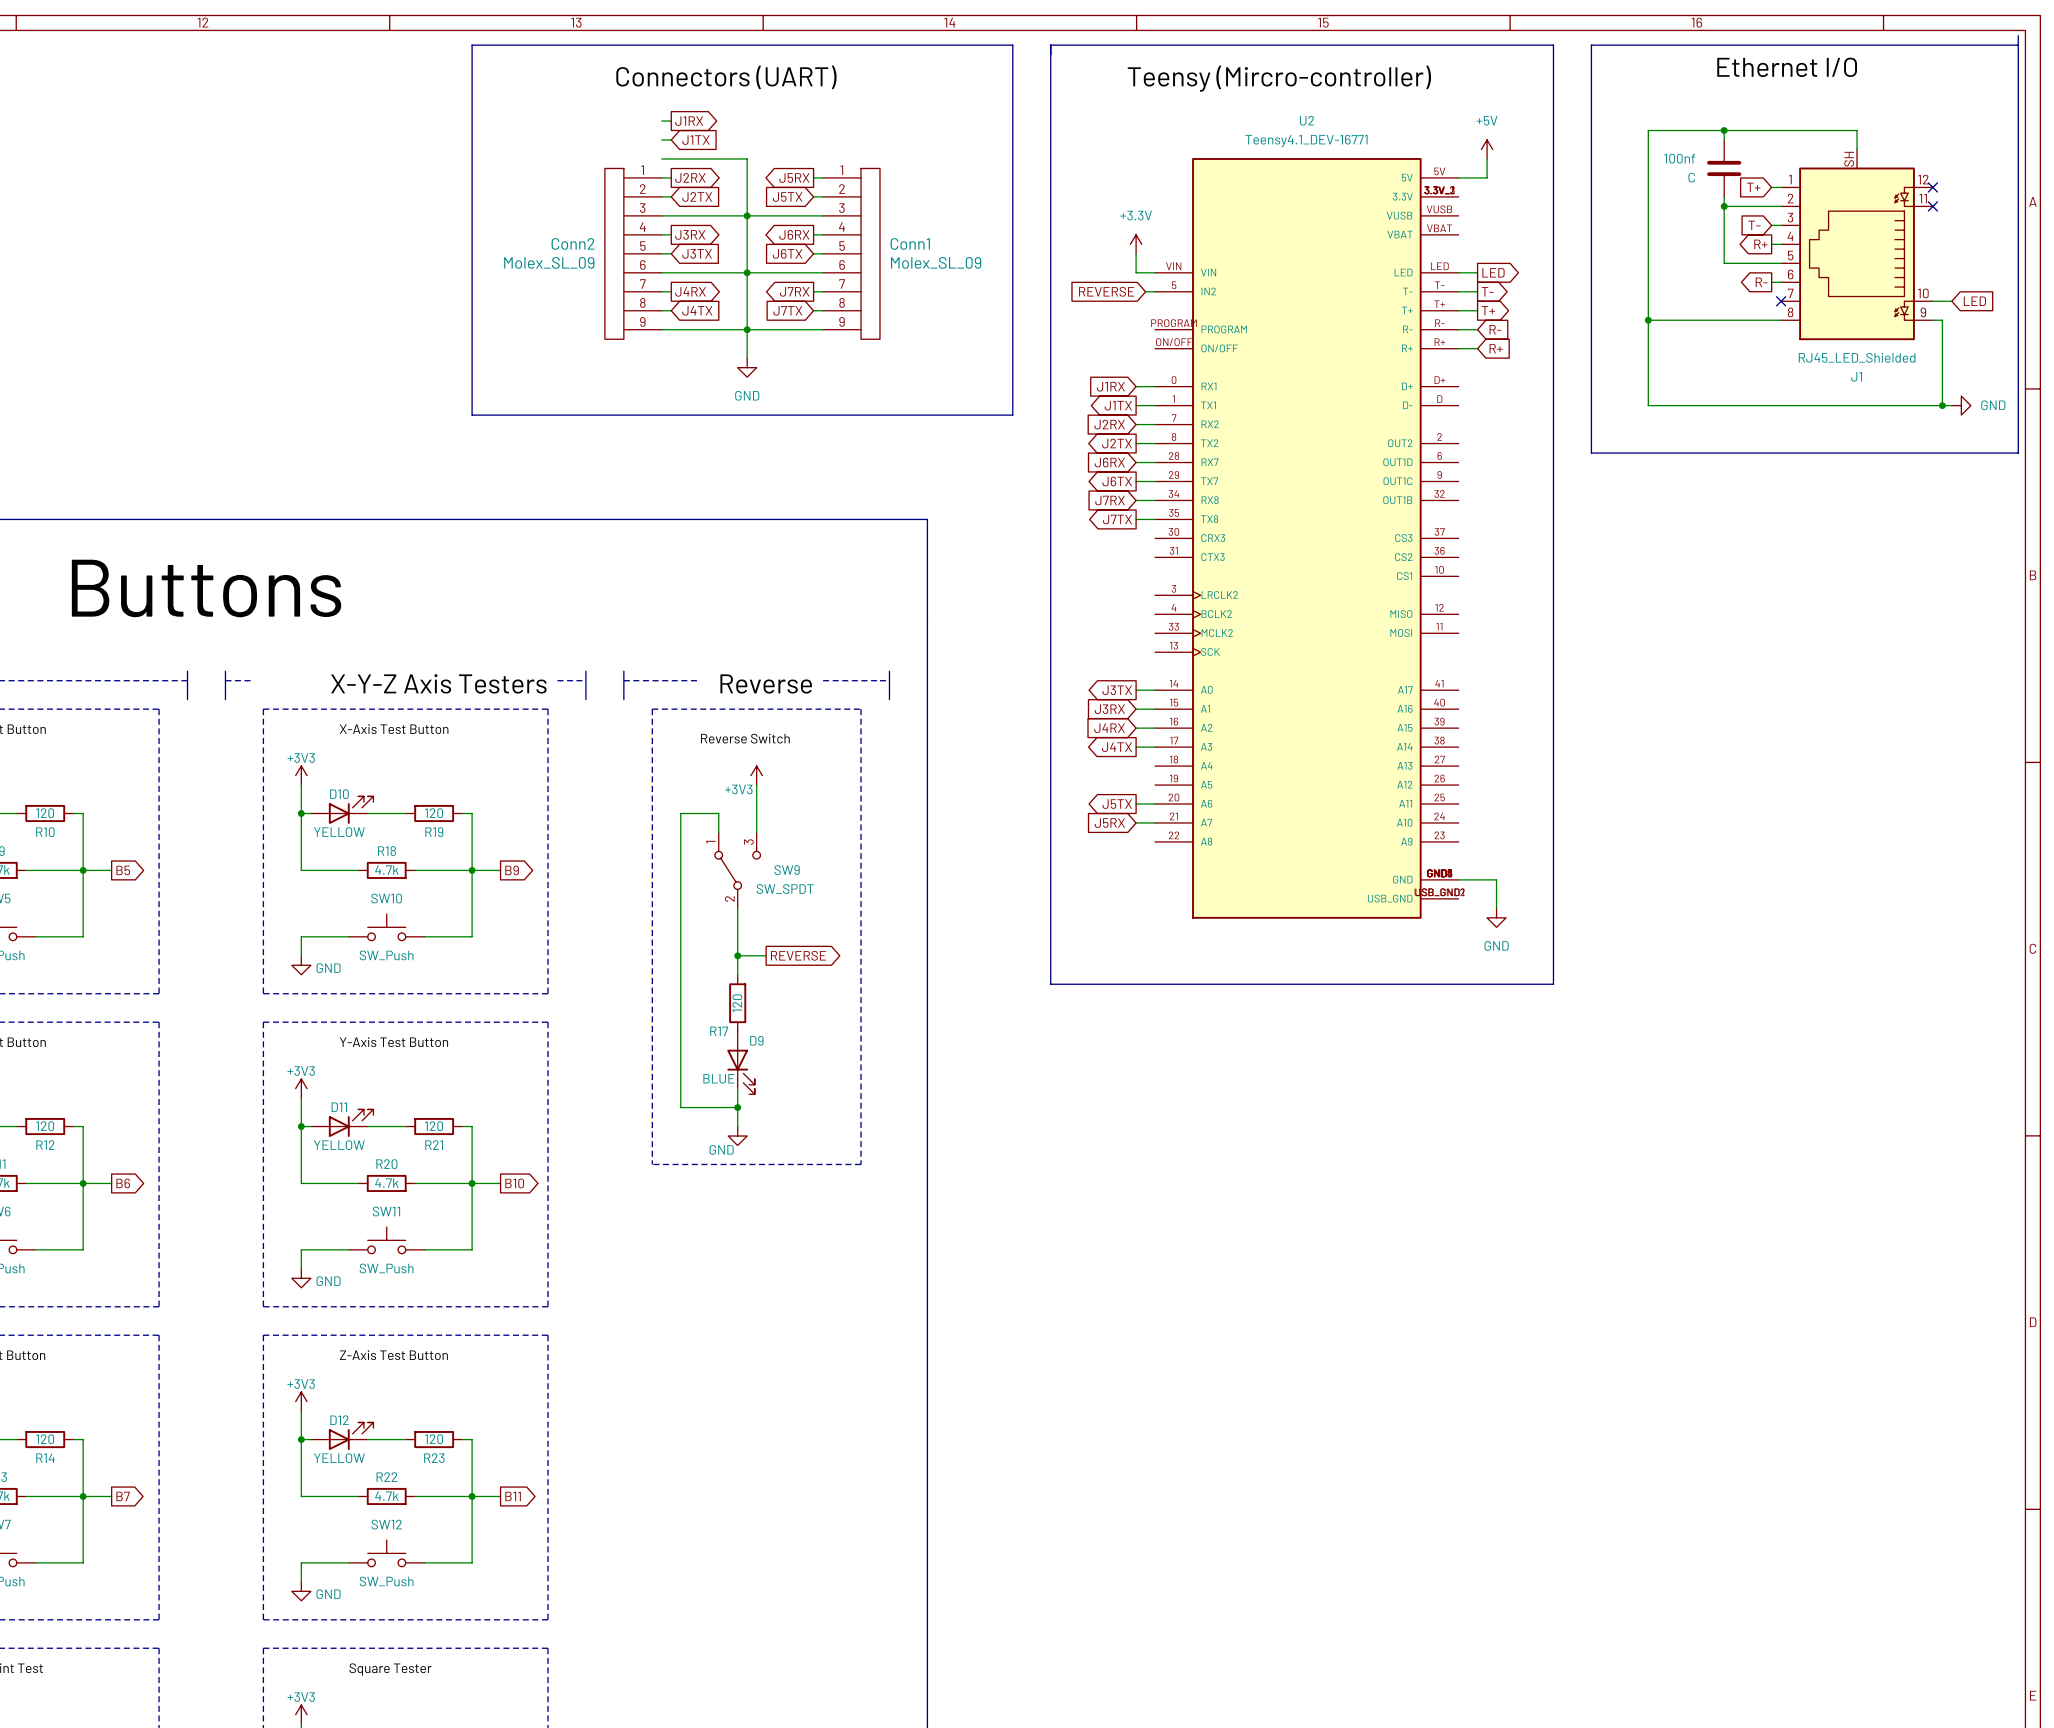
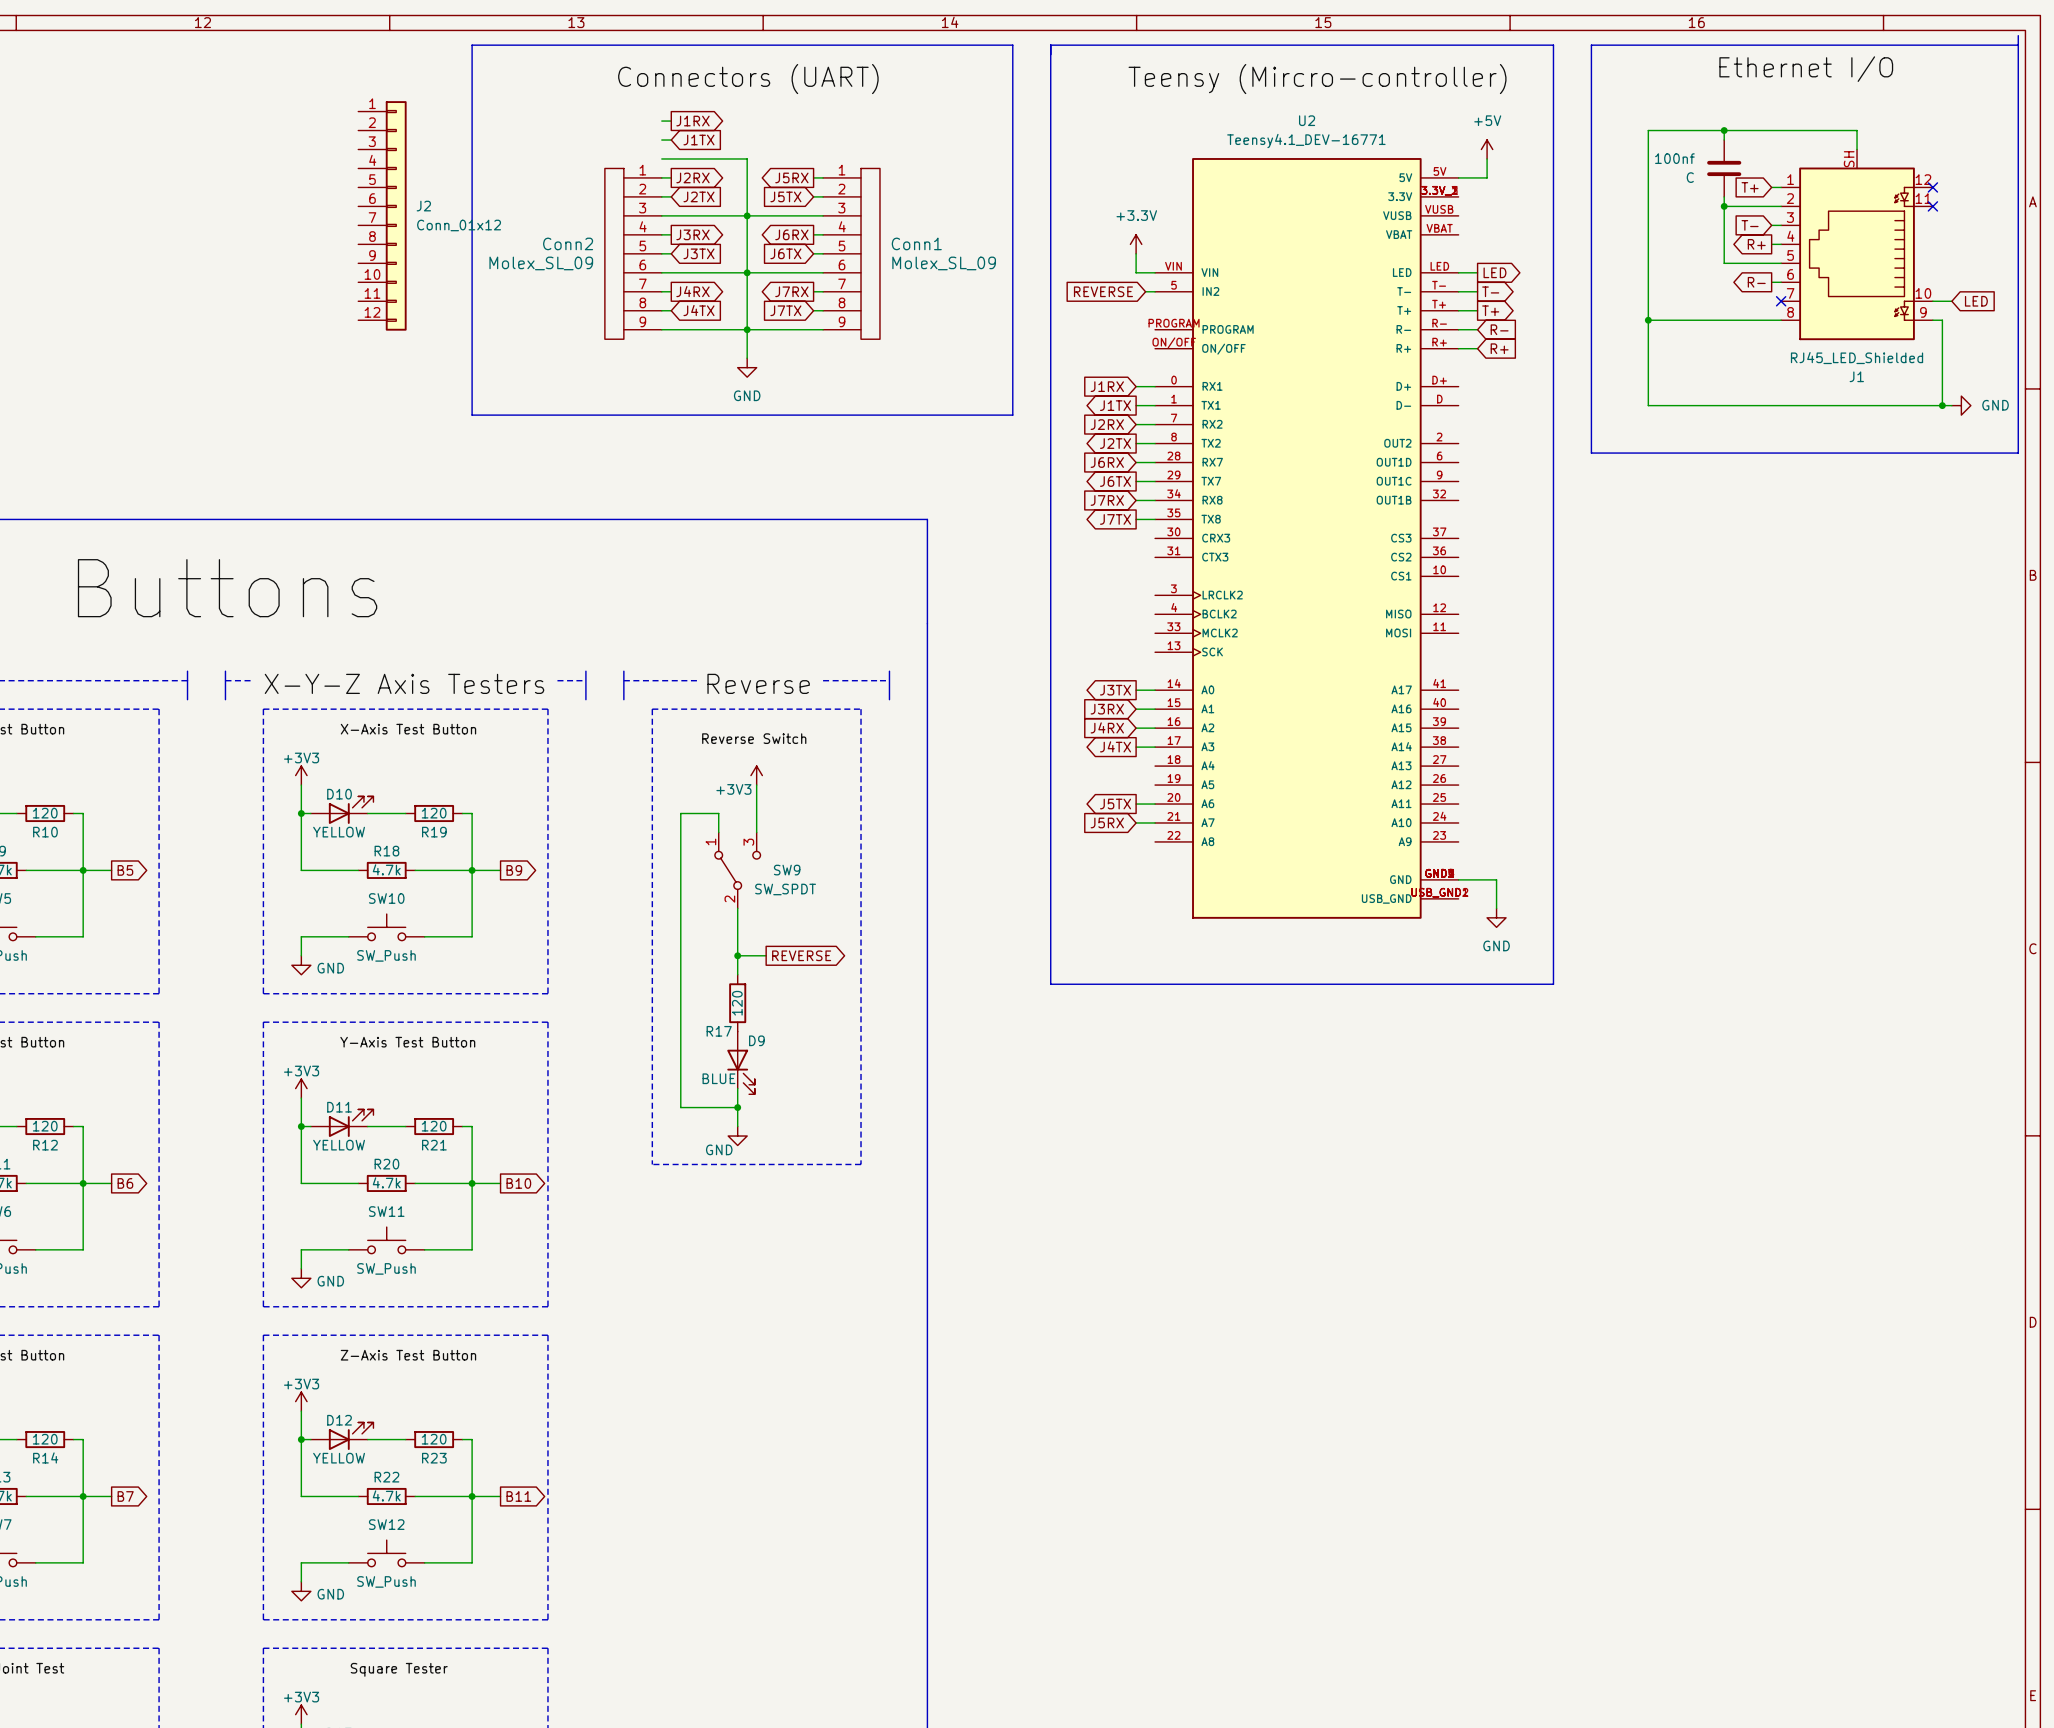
J2: none -> Conn_01x12 (382, 215)

